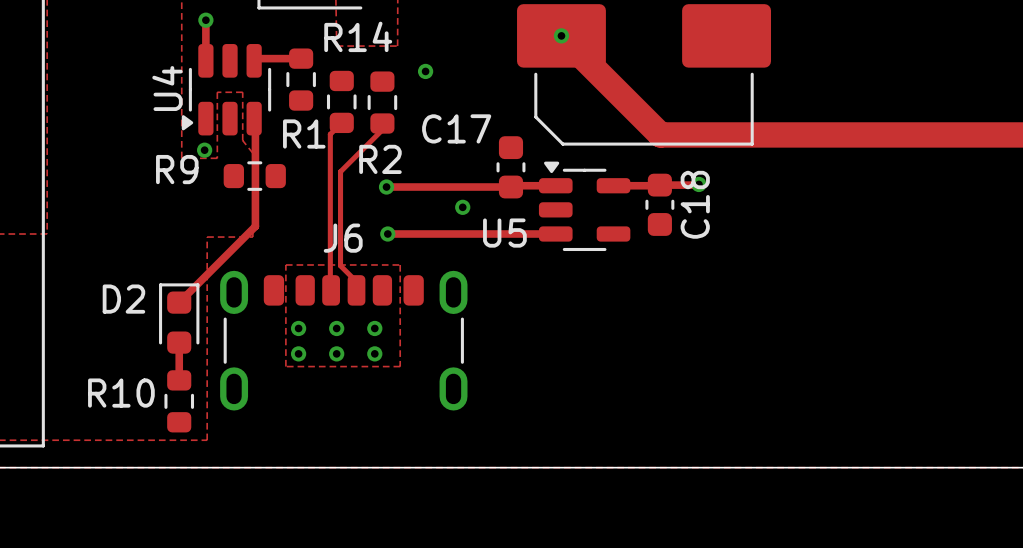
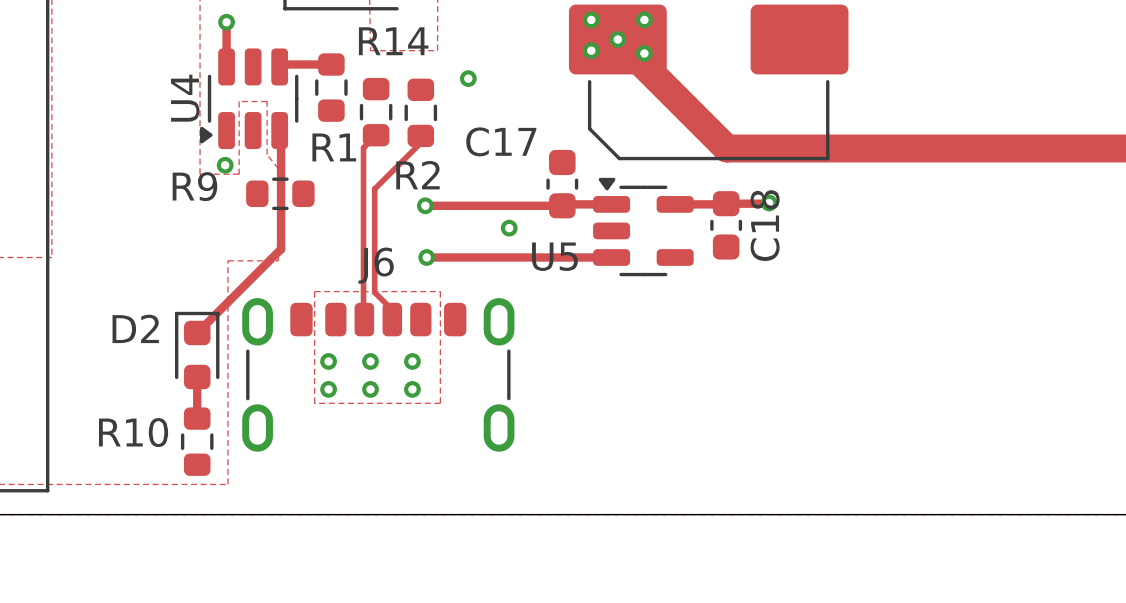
via: none -> (591, 19)
via: none -> (644, 19)
via: none -> (591, 50)
via: none -> (644, 53)

